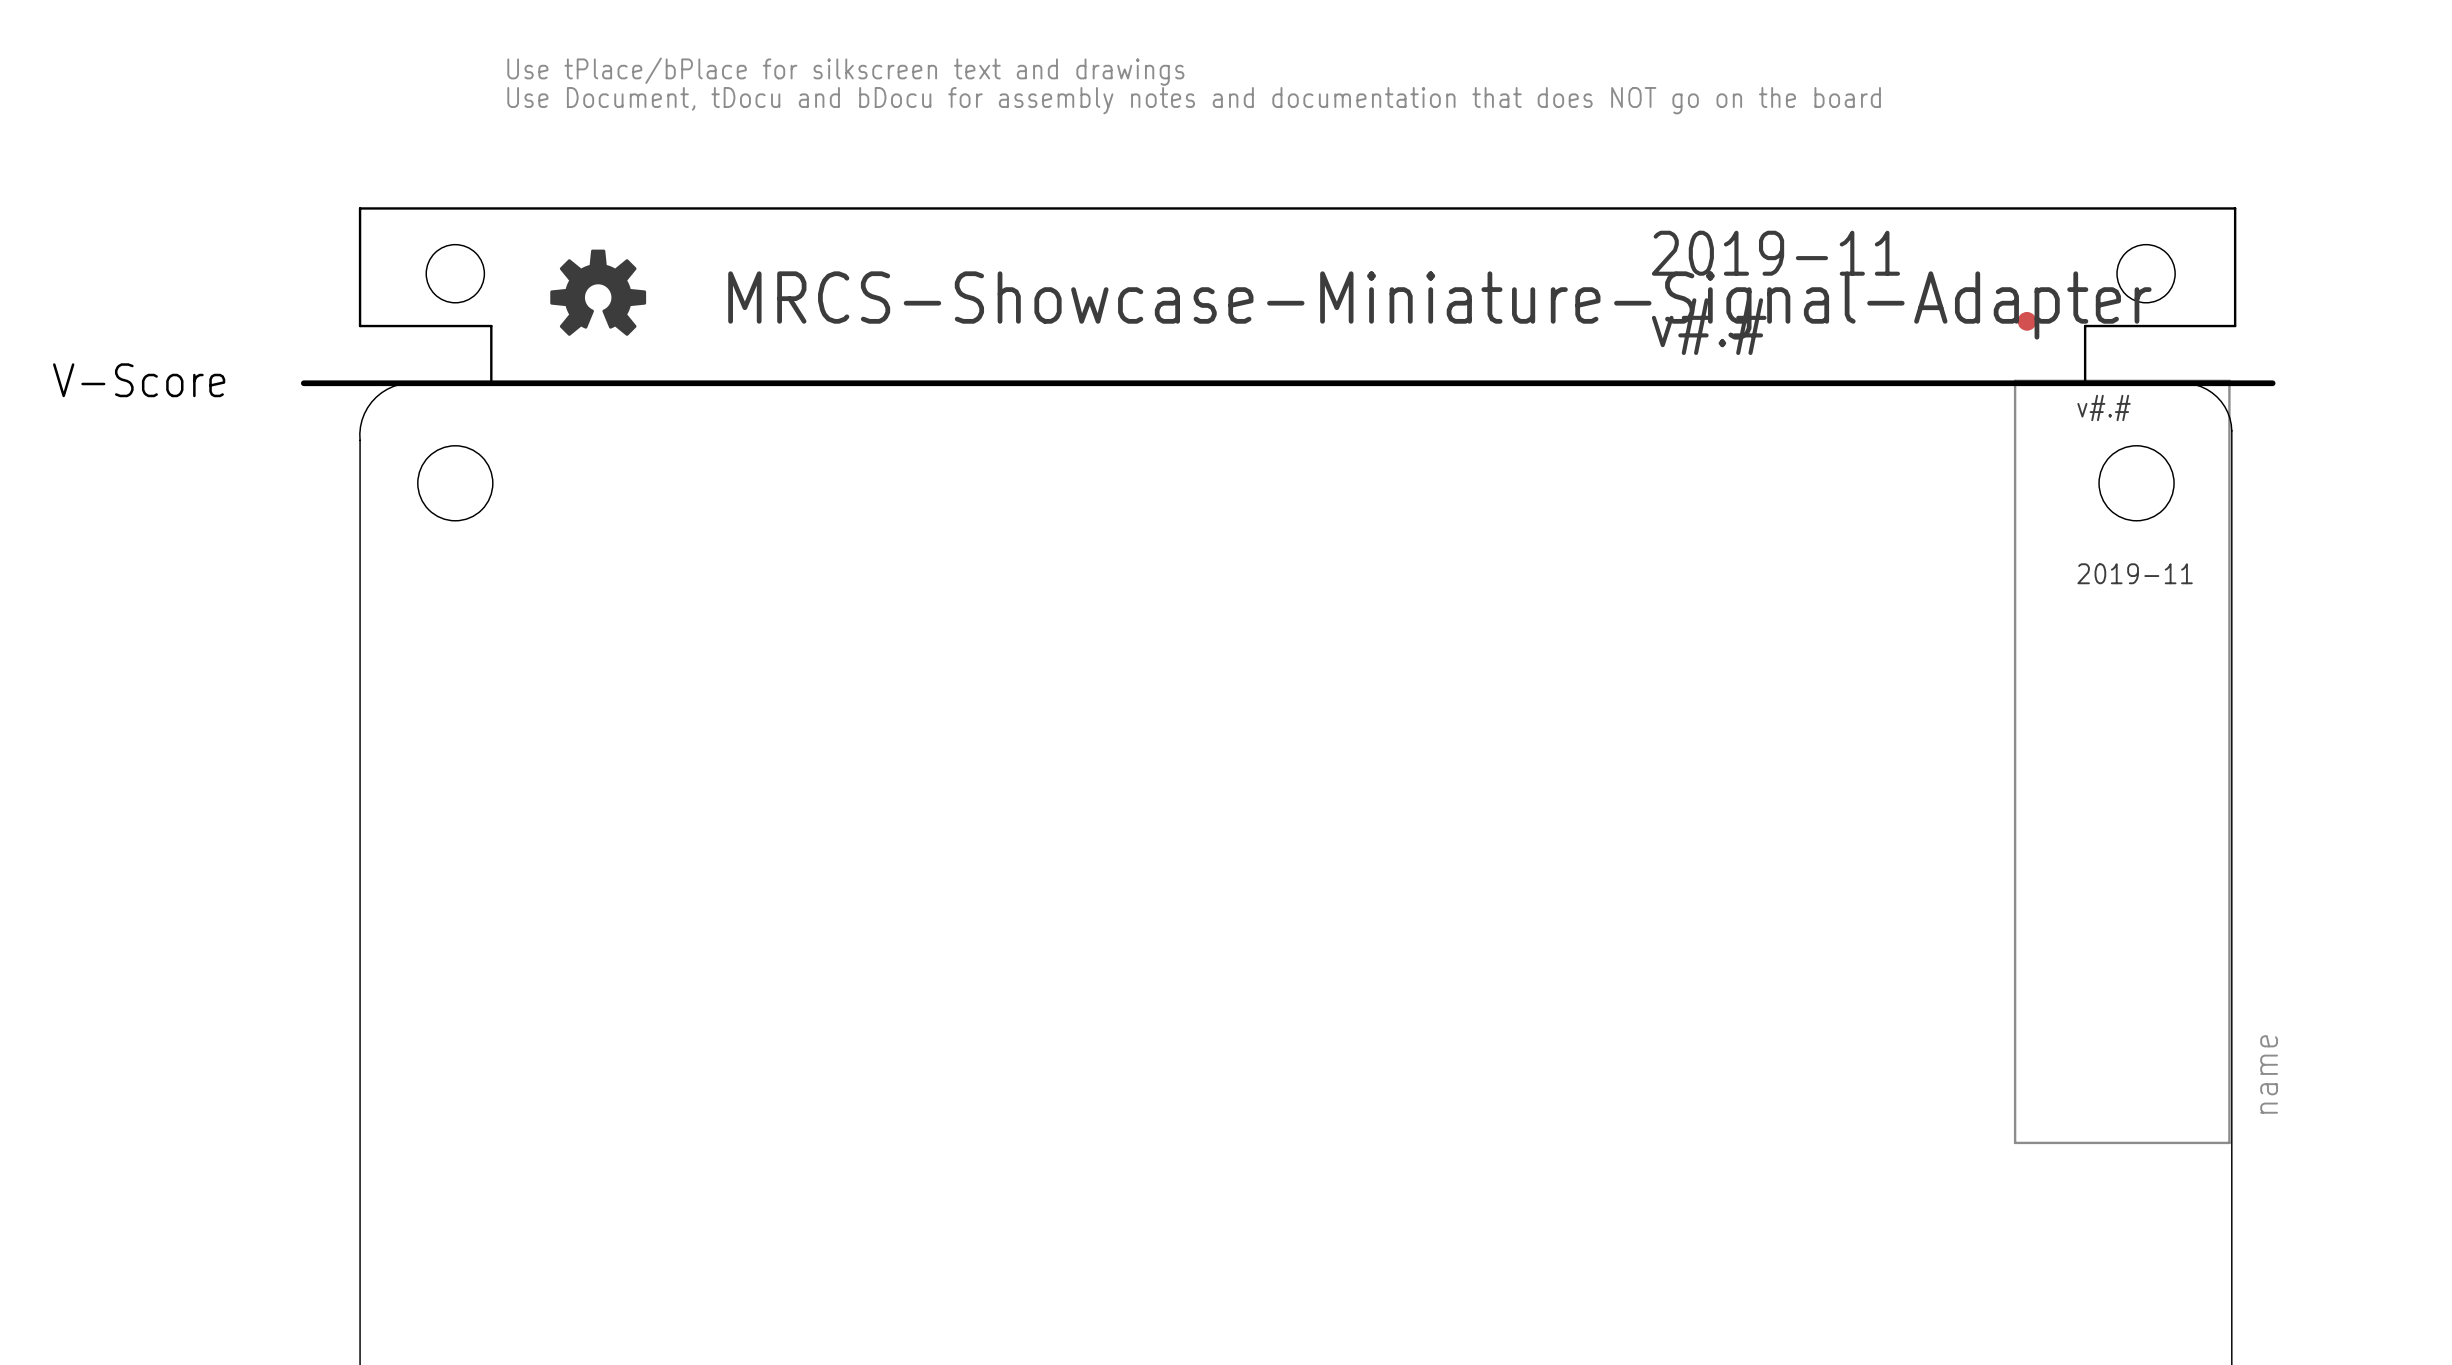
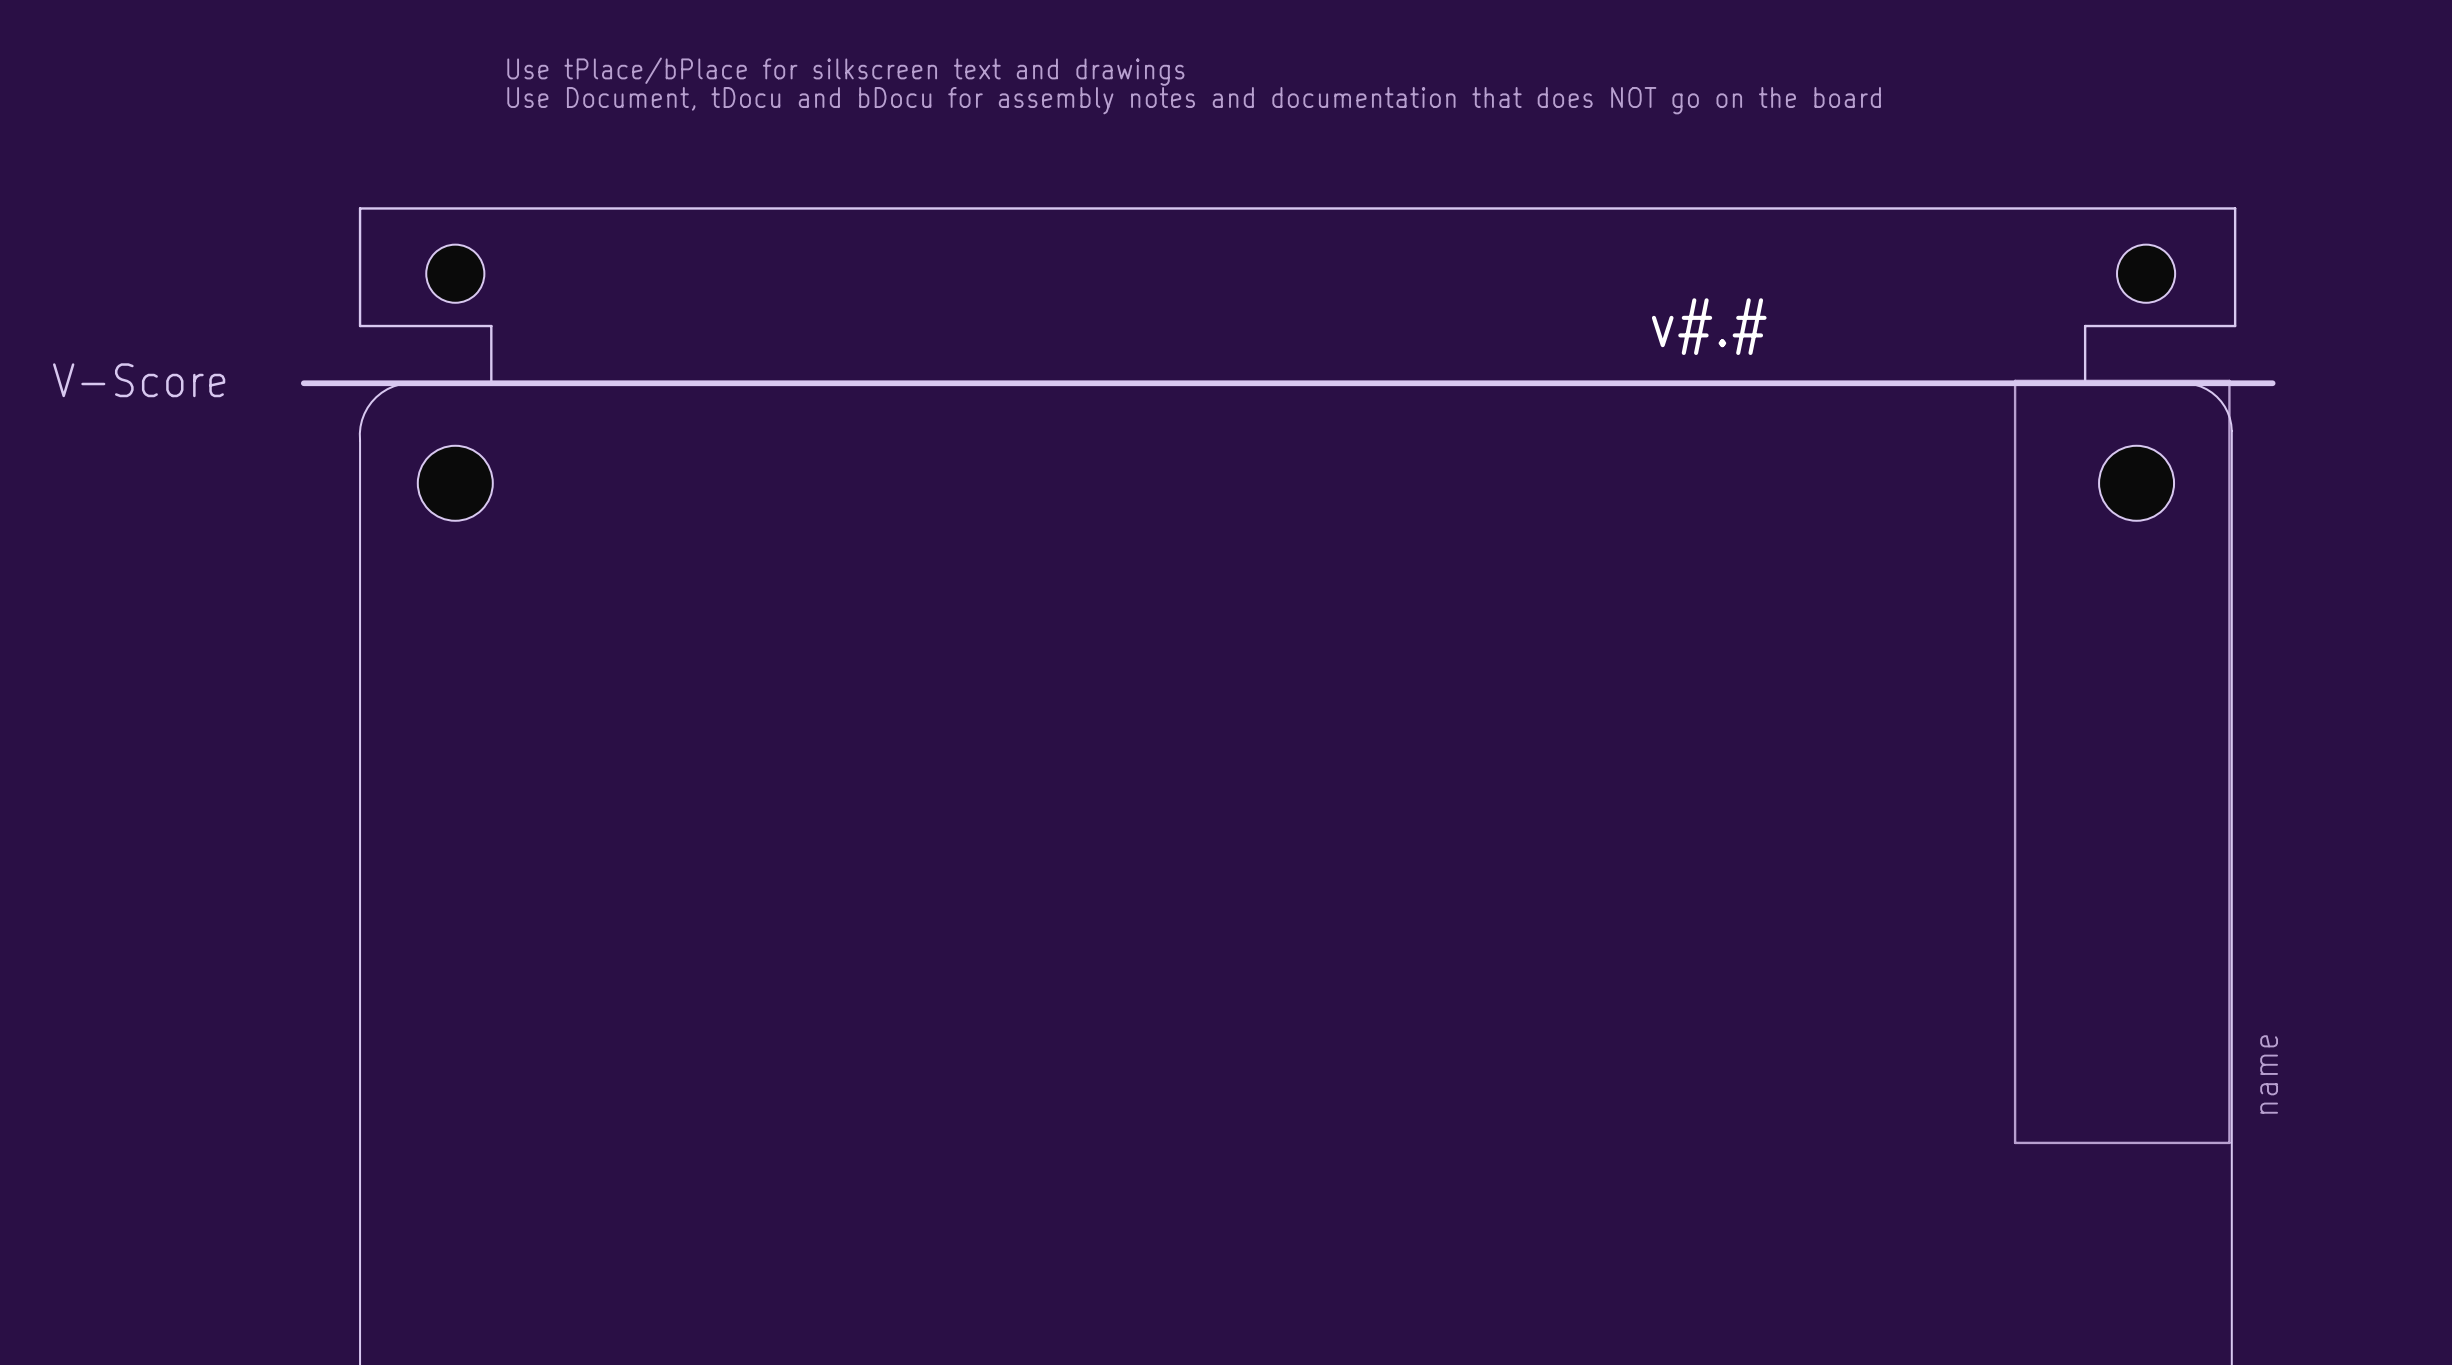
drawing: [550, 249, 647, 336] -> none
text: 2019-11 (1775, 253) -> none
text: MRCS-Showcase-Miniature-Signal-Adapter (1439, 305) -> none
part: (2027, 321) -> none
text: v#.# (2104, 407) -> none
text: 2019-11 (2135, 573) -> none

